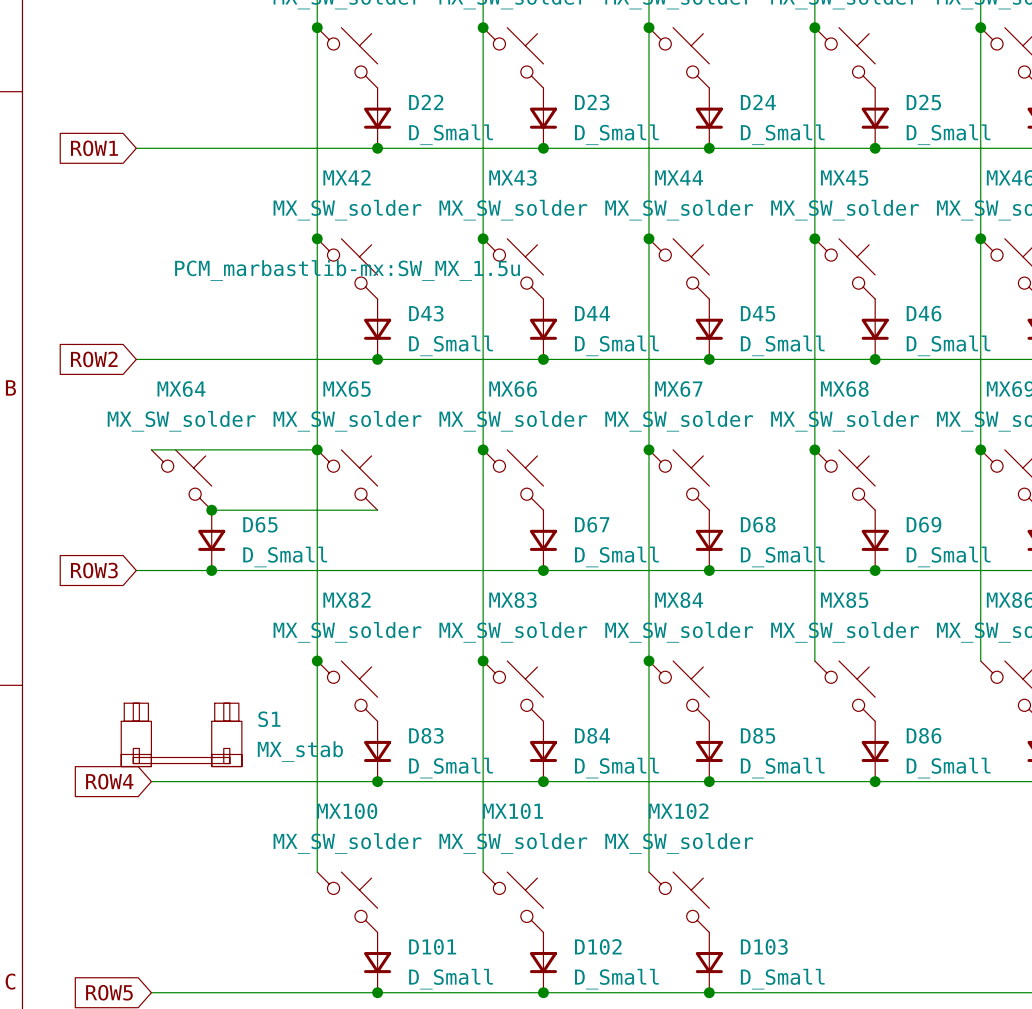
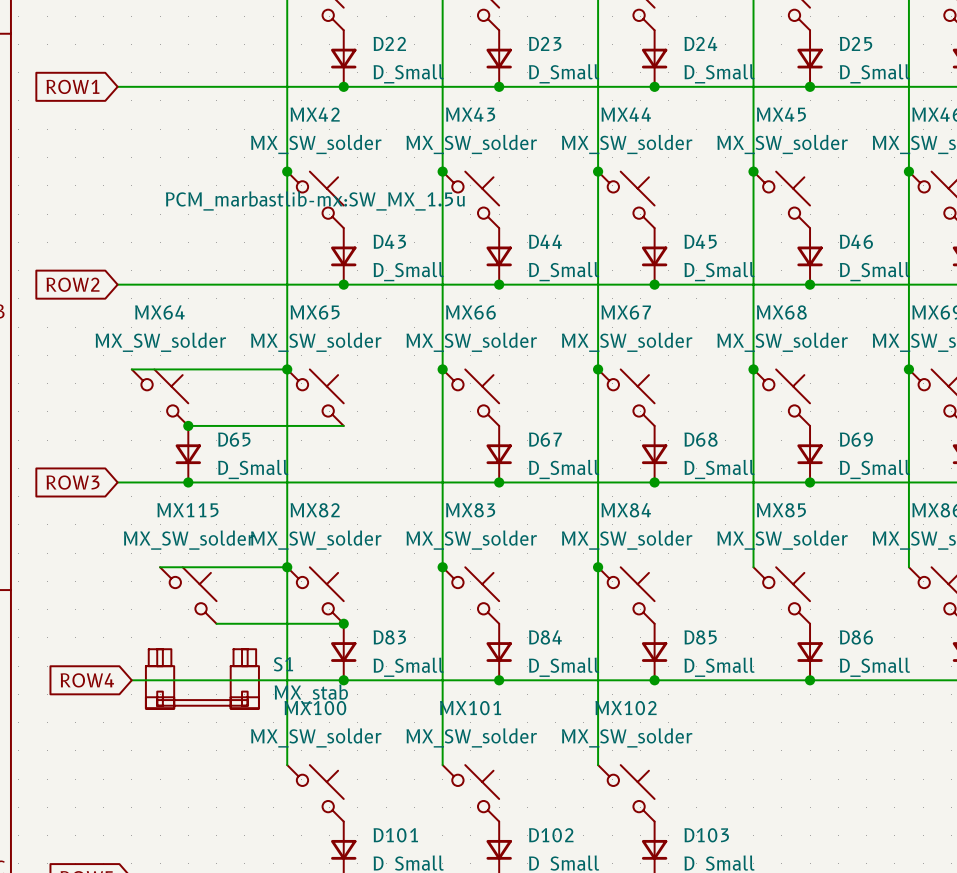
wire: none -> (160, 567) (287, 567)
MX115: none -> MX_SW_solder (188, 595)
wire: none -> (216, 623) (343, 623)
junction: none -> (343, 623)
S1 position: (181, 734) -> (202, 678)

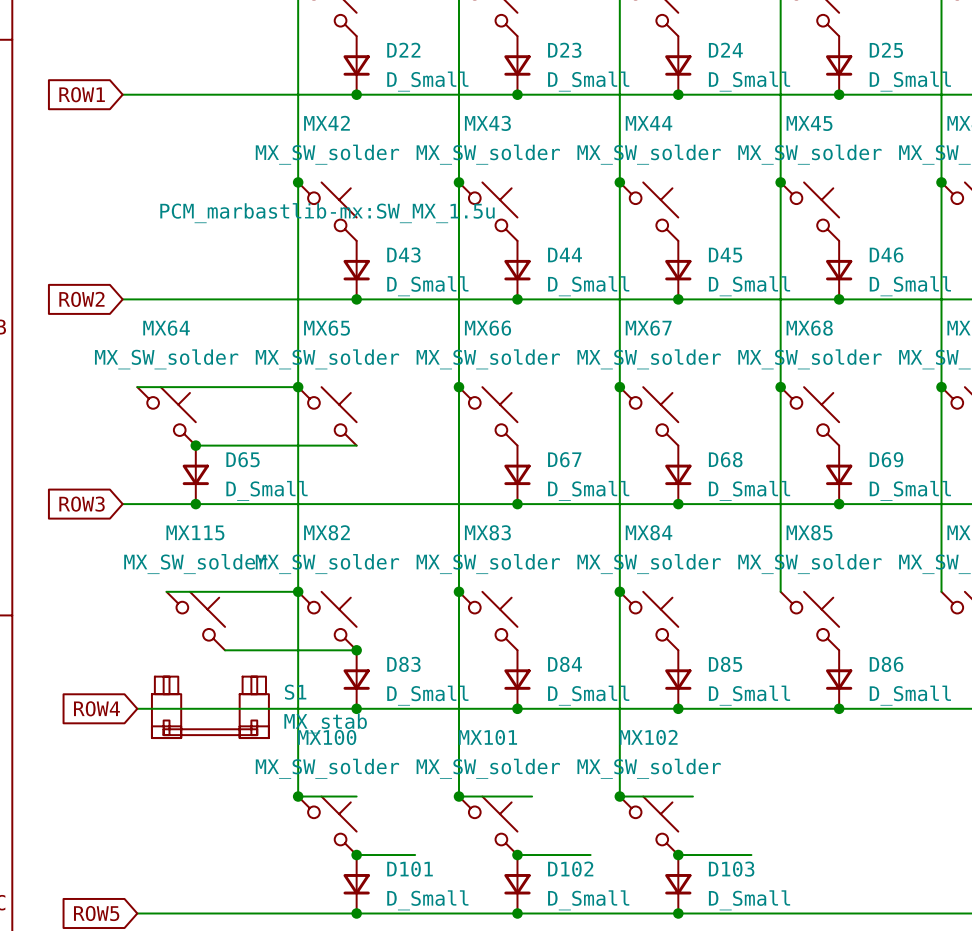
wire: none -> (298, 796) (356, 796)
junction: none -> (298, 796)
wire: none -> (458, 796) (532, 796)
junction: none -> (458, 796)
wire: none -> (619, 796) (692, 796)
junction: none -> (619, 796)
wire: none -> (356, 855) (415, 855)
junction: none -> (356, 855)
wire: none -> (517, 855) (590, 855)
junction: none -> (517, 855)
wire: none -> (678, 855) (751, 855)
junction: none -> (678, 855)

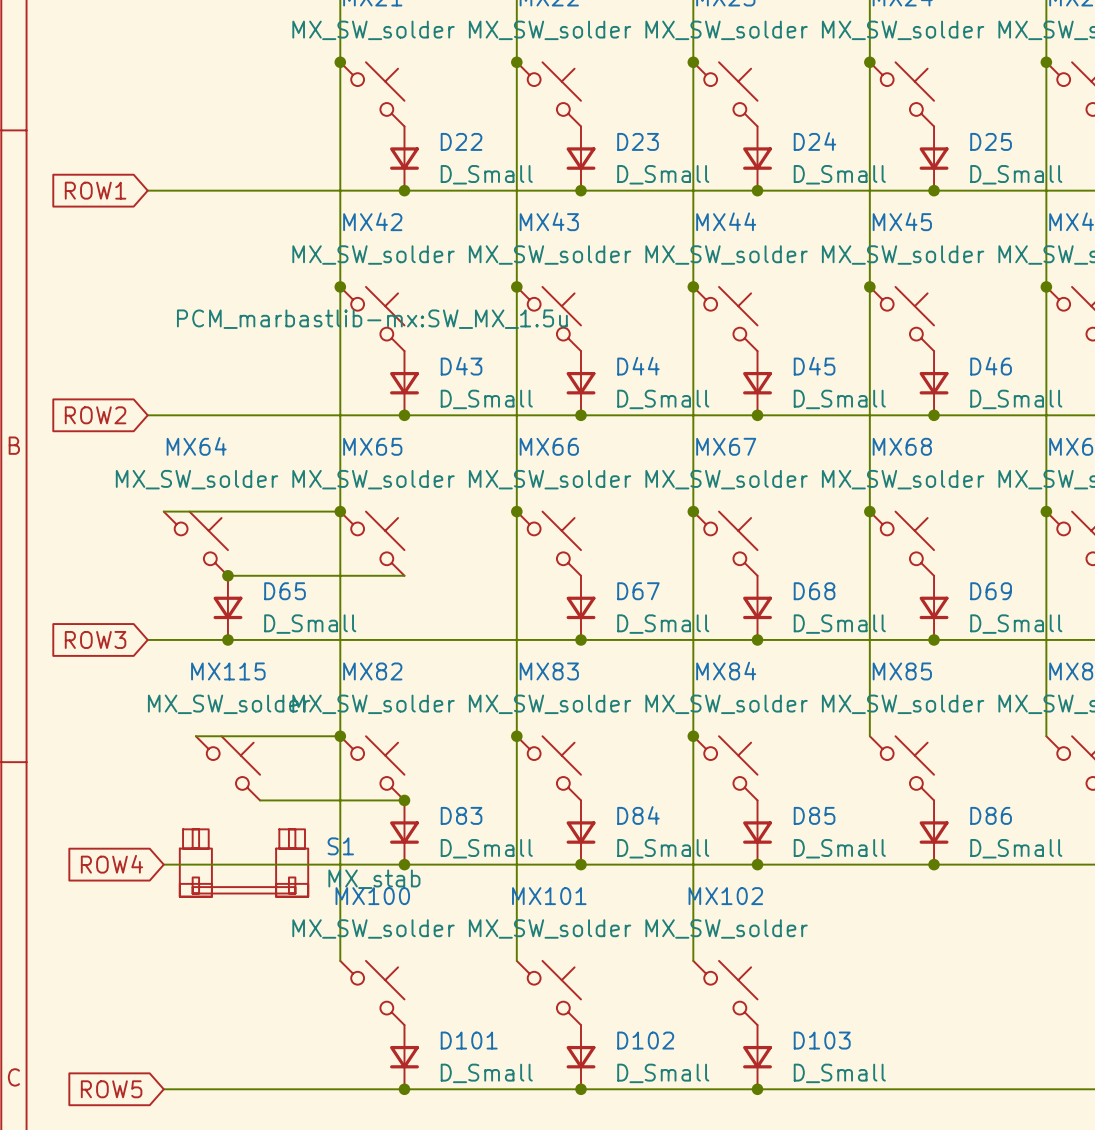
wire: (298, 796) (356, 796) -> none
junction: (298, 796) -> none
wire: (458, 796) (532, 796) -> none
junction: (458, 796) -> none
wire: (619, 796) (692, 796) -> none
junction: (619, 796) -> none
wire: (356, 855) (415, 855) -> none
junction: (356, 855) -> none
wire: (517, 855) (590, 855) -> none
junction: (517, 855) -> none
wire: (678, 855) (751, 855) -> none
junction: (678, 855) -> none

